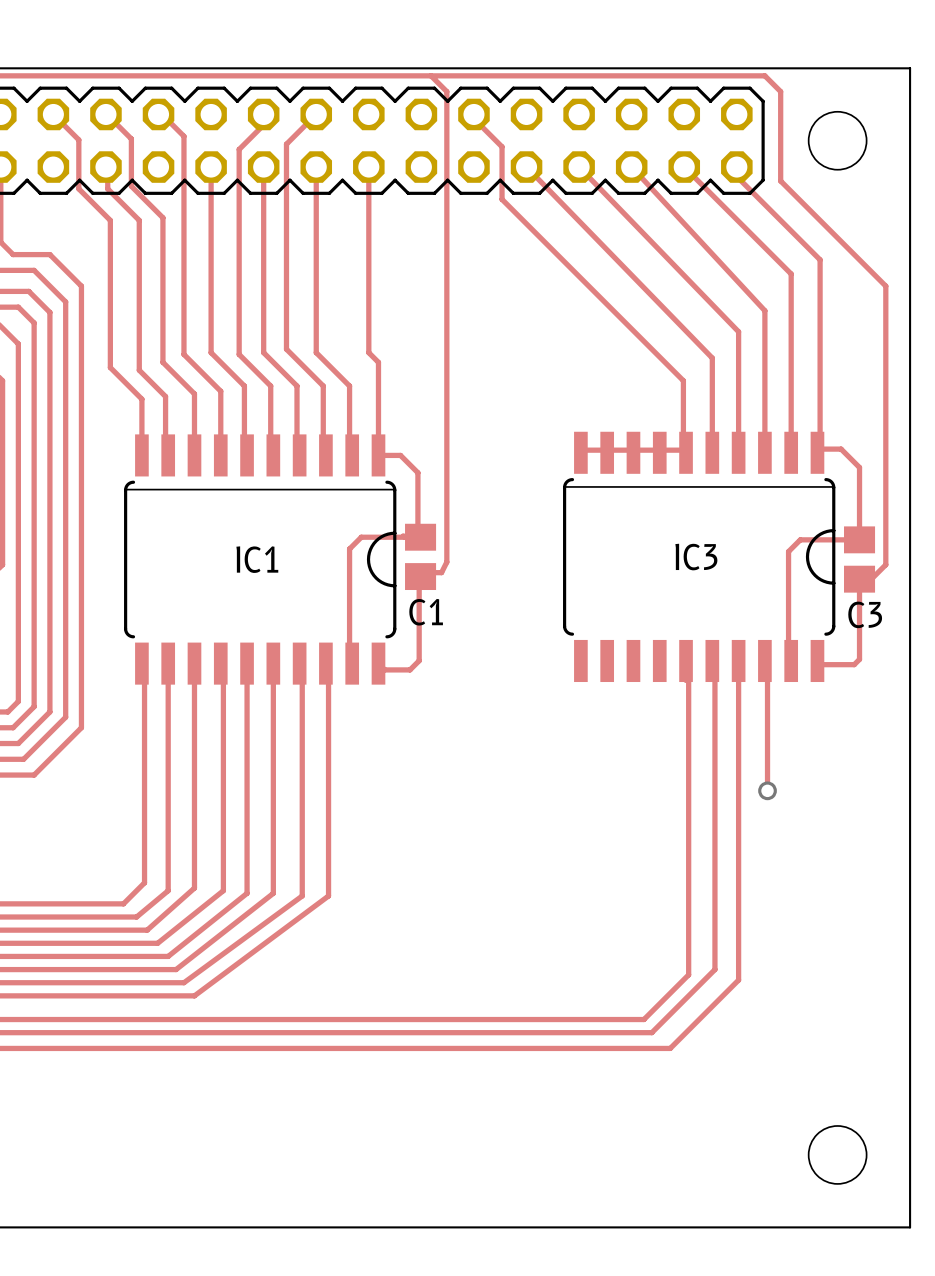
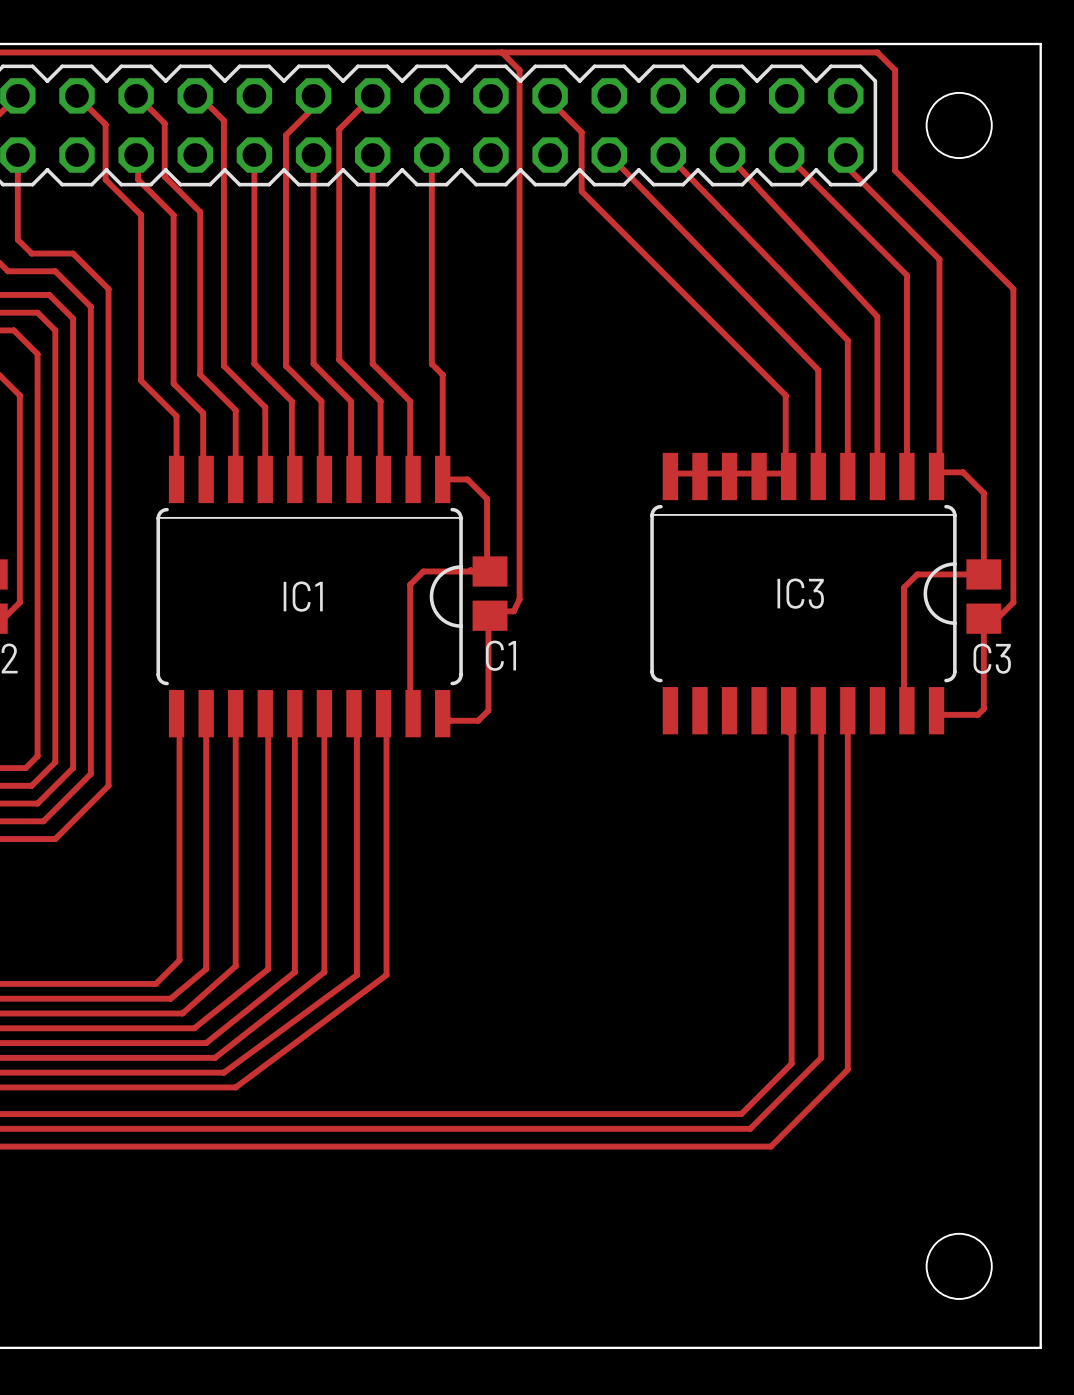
track: (764, 660) (767, 660) (767, 790) -> none
via: (767, 790) -> none

